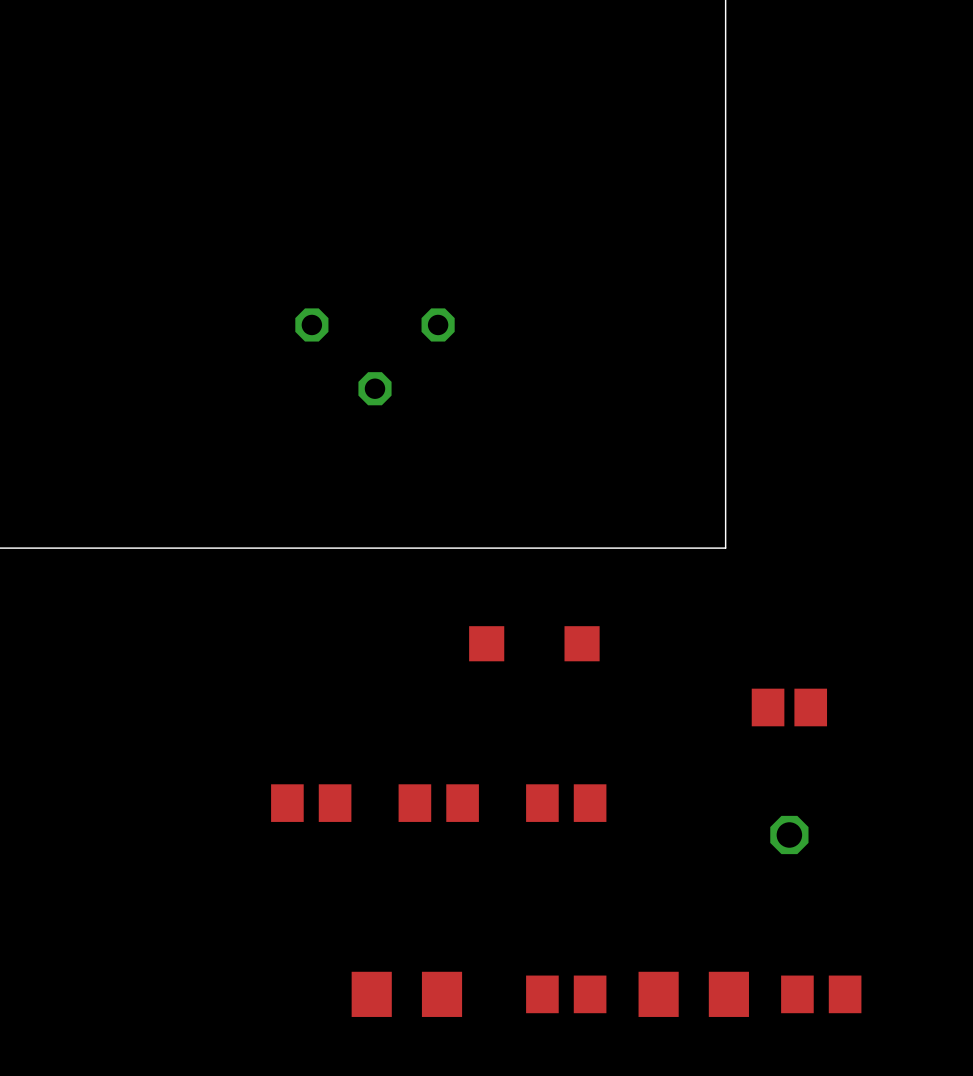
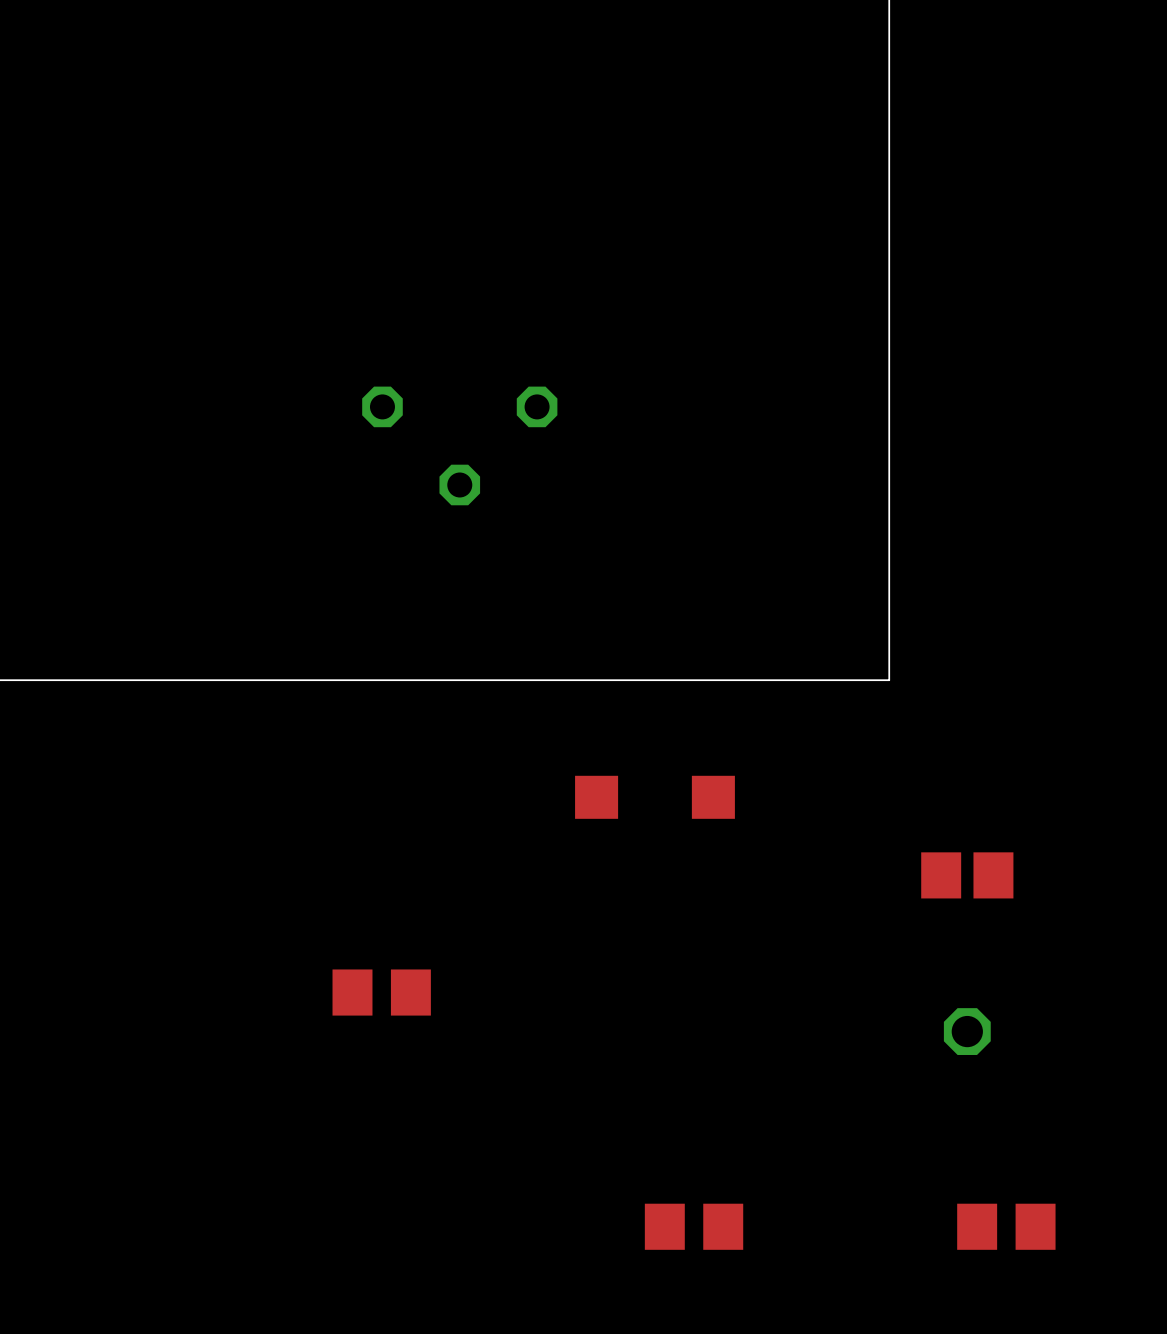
part: (438, 803) -> none
part: (566, 803) -> none
part: (406, 994) -> none
part: (693, 994) -> none

